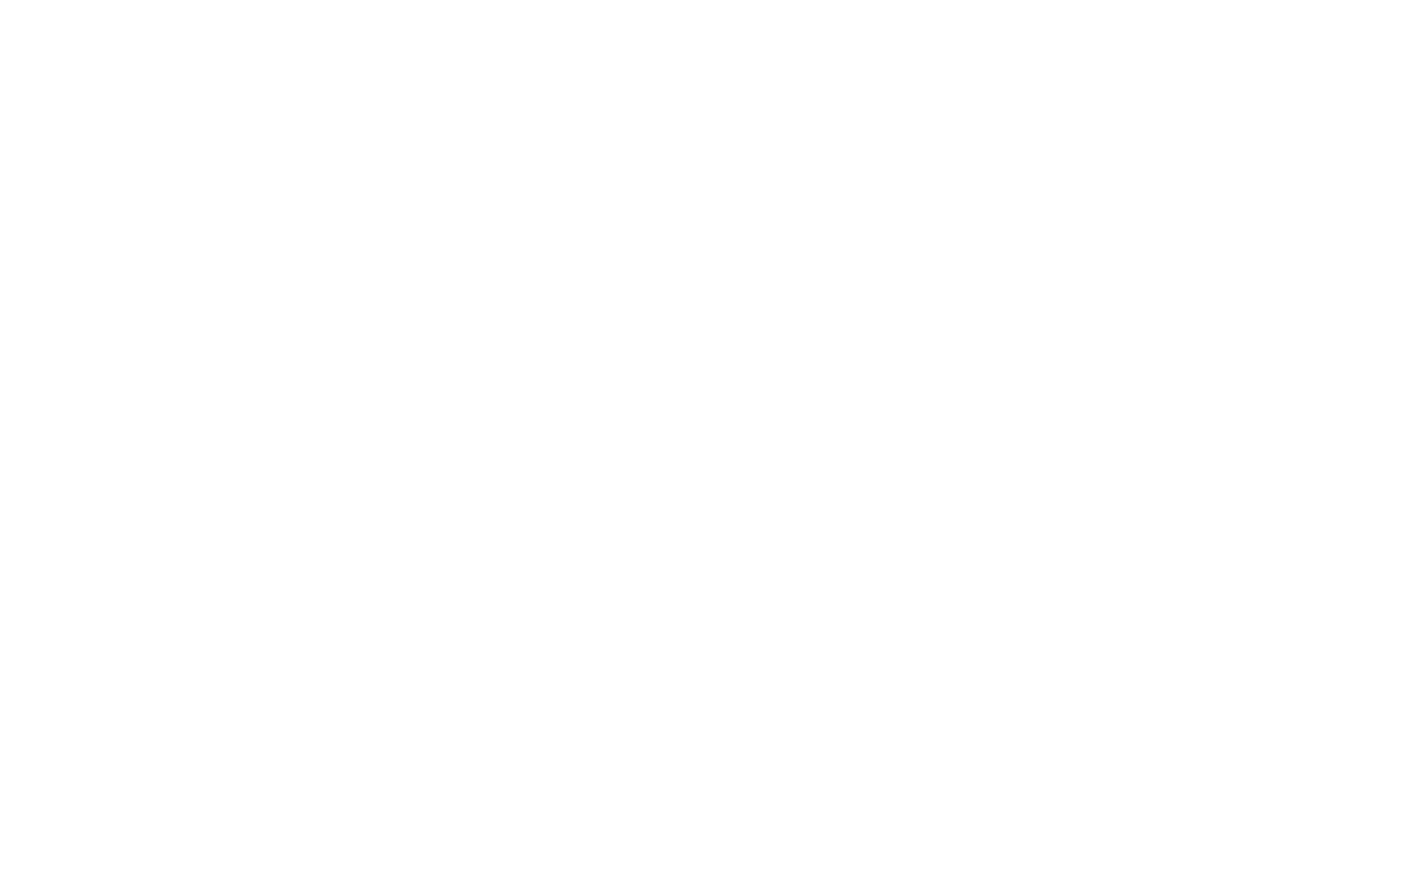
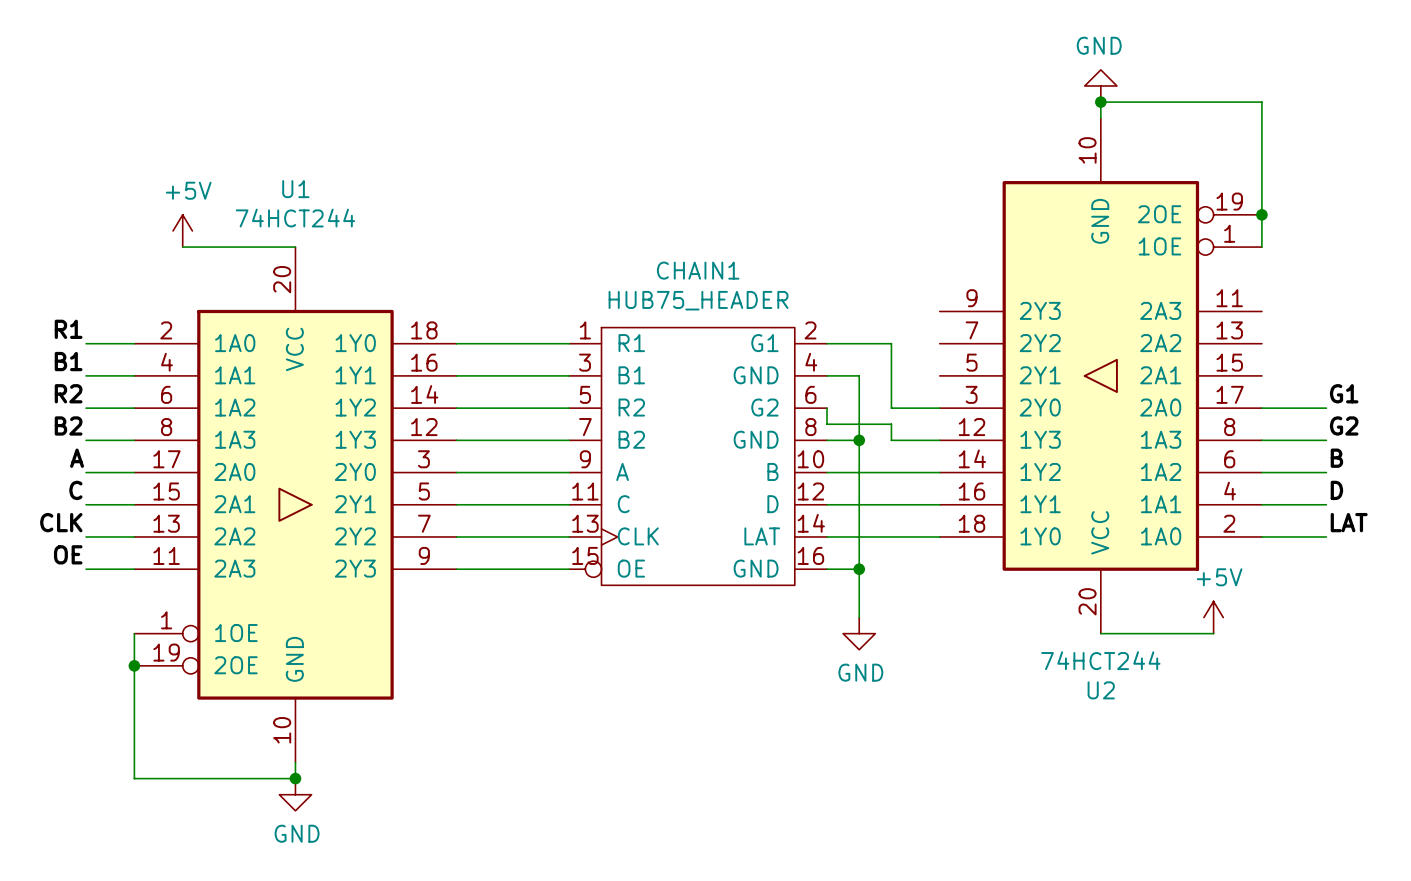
power symbol: none -> GND (1100, 85)
junction: none -> (1100, 102)
wire: none -> (1100, 118) (1100, 102) (1261, 102) (1261, 247)
junction: none -> (1261, 214)
power symbol: none -> +5V (182, 230)
wire: none -> (182, 247) (295, 247)
label: none -> R1 (68, 329)
wire: none -> (86, 343) (134, 343)
wire: none -> (456, 343) (569, 343)
wire: none -> (827, 343) (891, 343) (891, 408) (939, 408)
label: none -> B1 (68, 361)
wire: none -> (86, 375) (134, 375)
wire: none -> (456, 375) (569, 375)
wire: none -> (827, 375) (859, 375) (859, 617)
U2: none -> 74HCT244 (1100, 375)
label: none -> R2 (68, 393)
label: none -> G1 (1344, 393)
wire: none -> (86, 408) (134, 408)
wire: none -> (456, 408) (569, 408)
wire: none -> (827, 408) (827, 424) (891, 424) (891, 440) (939, 440)
wire: none -> (1261, 408) (1326, 408)
label: none -> B2 (68, 425)
label: none -> G2 (1344, 425)
wire: none -> (86, 440) (134, 440)
wire: none -> (456, 440) (569, 440)
wire: none -> (827, 440) (859, 440)
junction: none -> (859, 440)
wire: none -> (1261, 440) (1326, 440)
CHAIN1: none -> HUB75_HEADER (698, 456)
label: none -> A (77, 458)
label: none -> B (1336, 458)
wire: none -> (86, 472) (134, 472)
wire: none -> (456, 472) (569, 472)
wire: none -> (827, 472) (939, 472)
wire: none -> (1261, 472) (1326, 472)
label: none -> C (75, 490)
label: none -> D (1336, 490)
wire: none -> (86, 504) (134, 504)
U1: none -> 74HCT244 (295, 504)
wire: none -> (456, 504) (569, 504)
wire: none -> (827, 504) (939, 504)
wire: none -> (1261, 504) (1326, 504)
label: none -> CLK (61, 522)
label: none -> LAT (1349, 522)
wire: none -> (86, 536) (134, 536)
wire: none -> (456, 536) (569, 536)
wire: none -> (827, 536) (939, 536)
wire: none -> (1261, 536) (1326, 536)
label: none -> OE (68, 554)
wire: none -> (86, 569) (134, 569)
wire: none -> (456, 569) (569, 569)
wire: none -> (827, 569) (859, 569)
junction: none -> (859, 569)
power symbol: none -> +5V (1213, 617)
wire: none -> (134, 633) (134, 778) (295, 778) (295, 762)
power symbol: none -> GND (859, 633)
wire: none -> (1100, 633) (1213, 633)
junction: none -> (134, 665)
junction: none -> (295, 778)
power symbol: none -> GND (295, 794)

